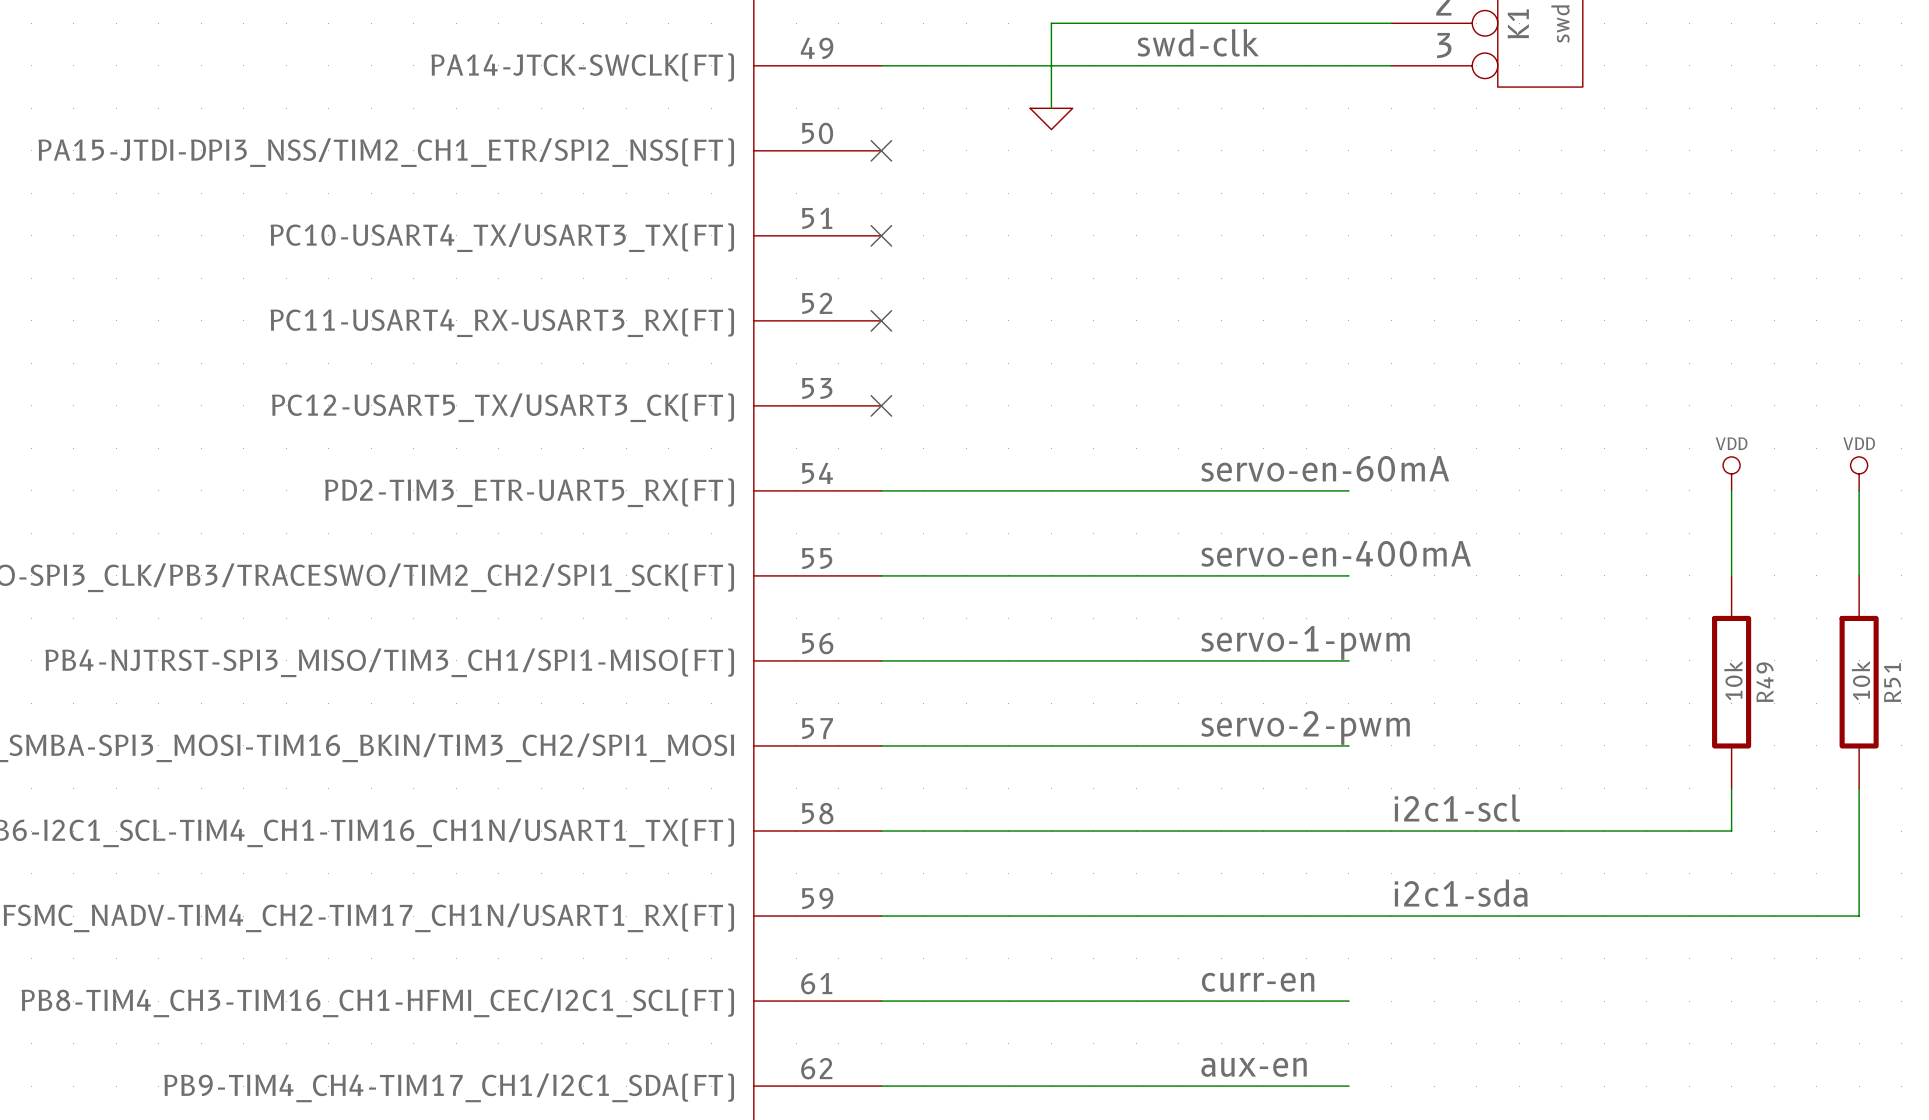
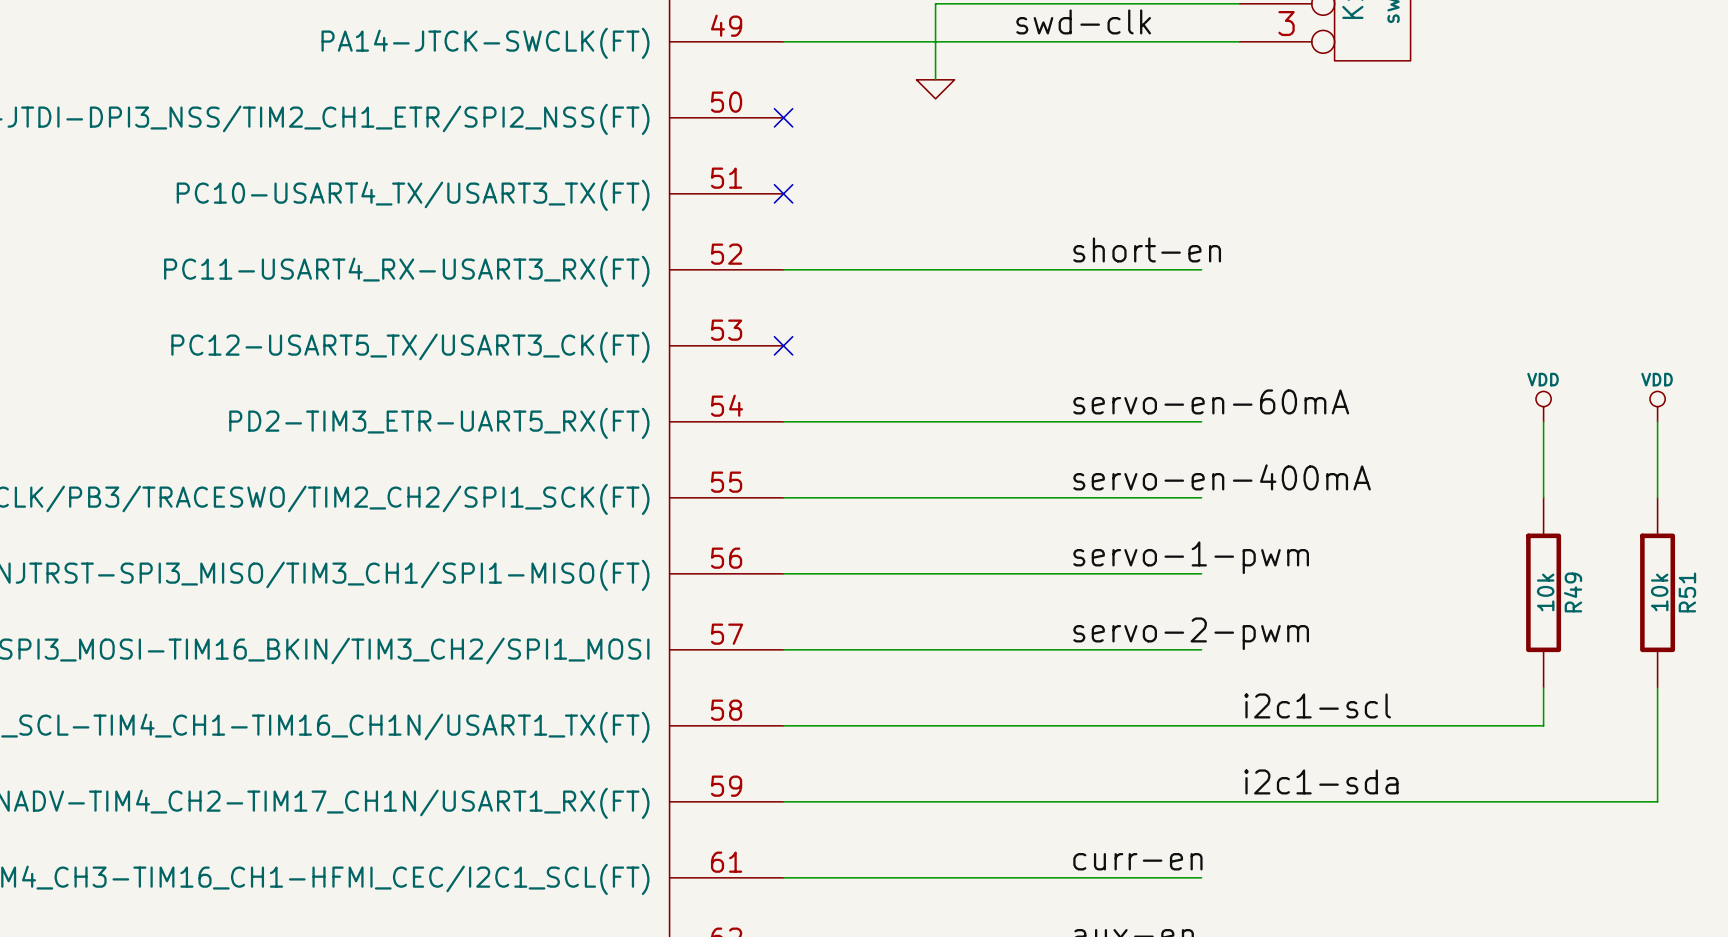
label: none -> short-en (1147, 249)
wire: none -> (783, 269) (1201, 269)
no-connect mark: (881, 320) -> none

